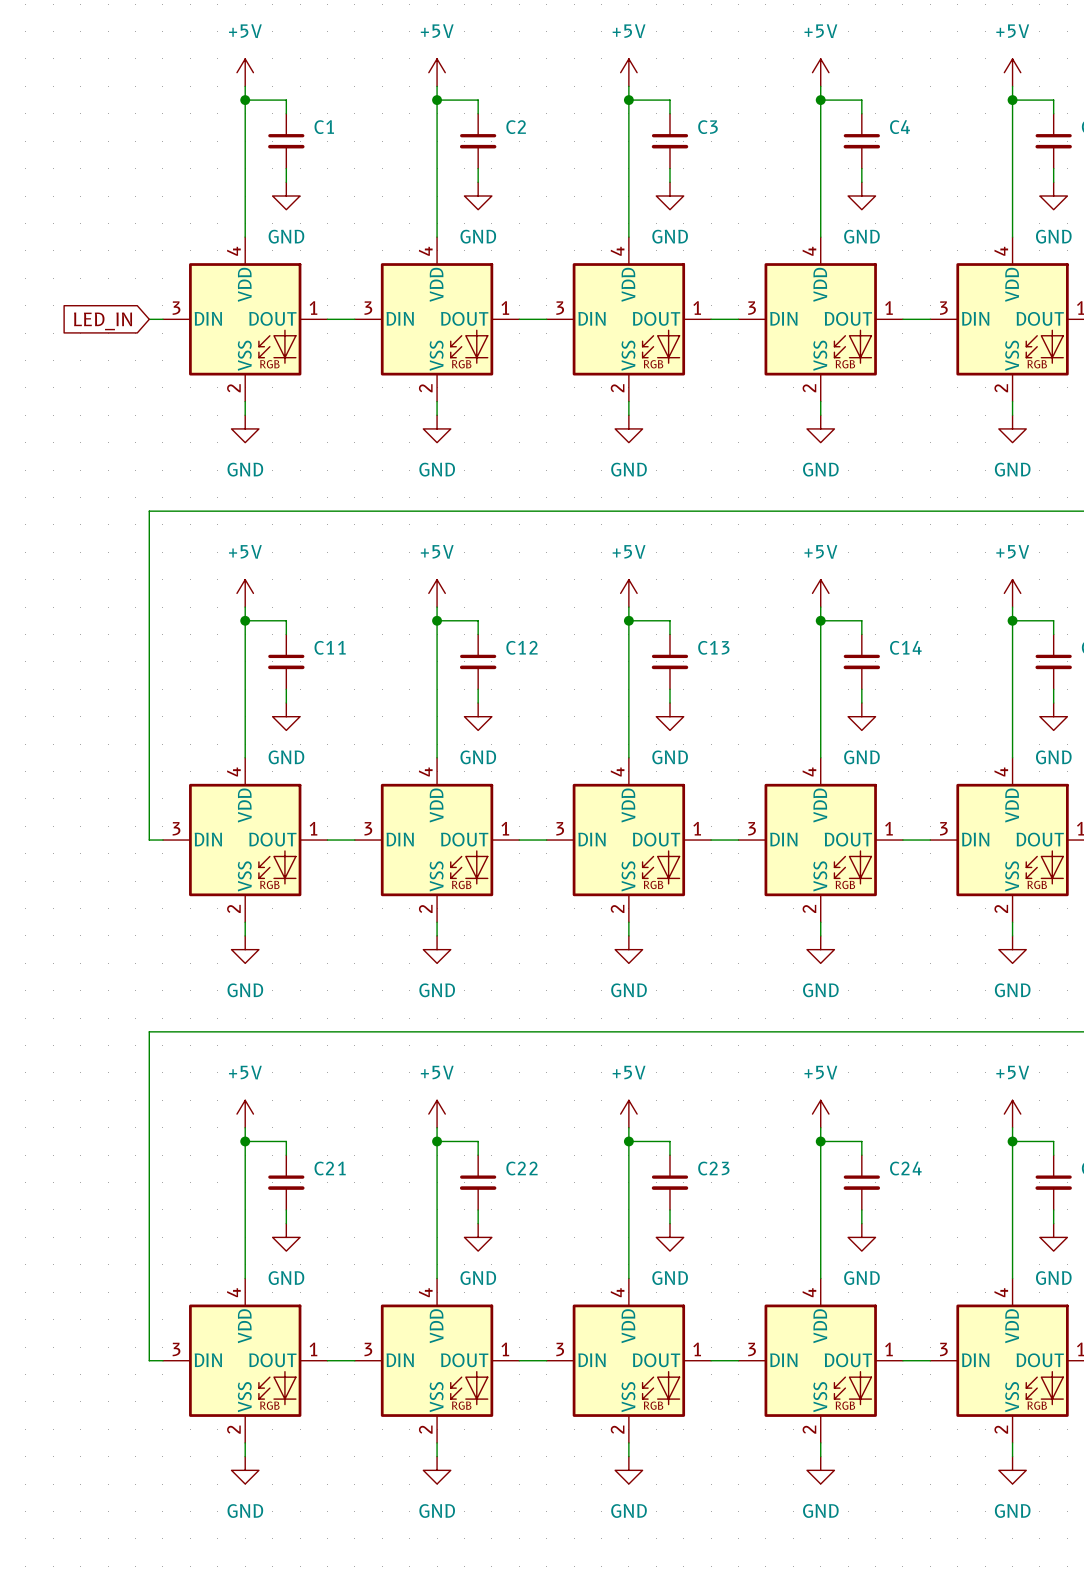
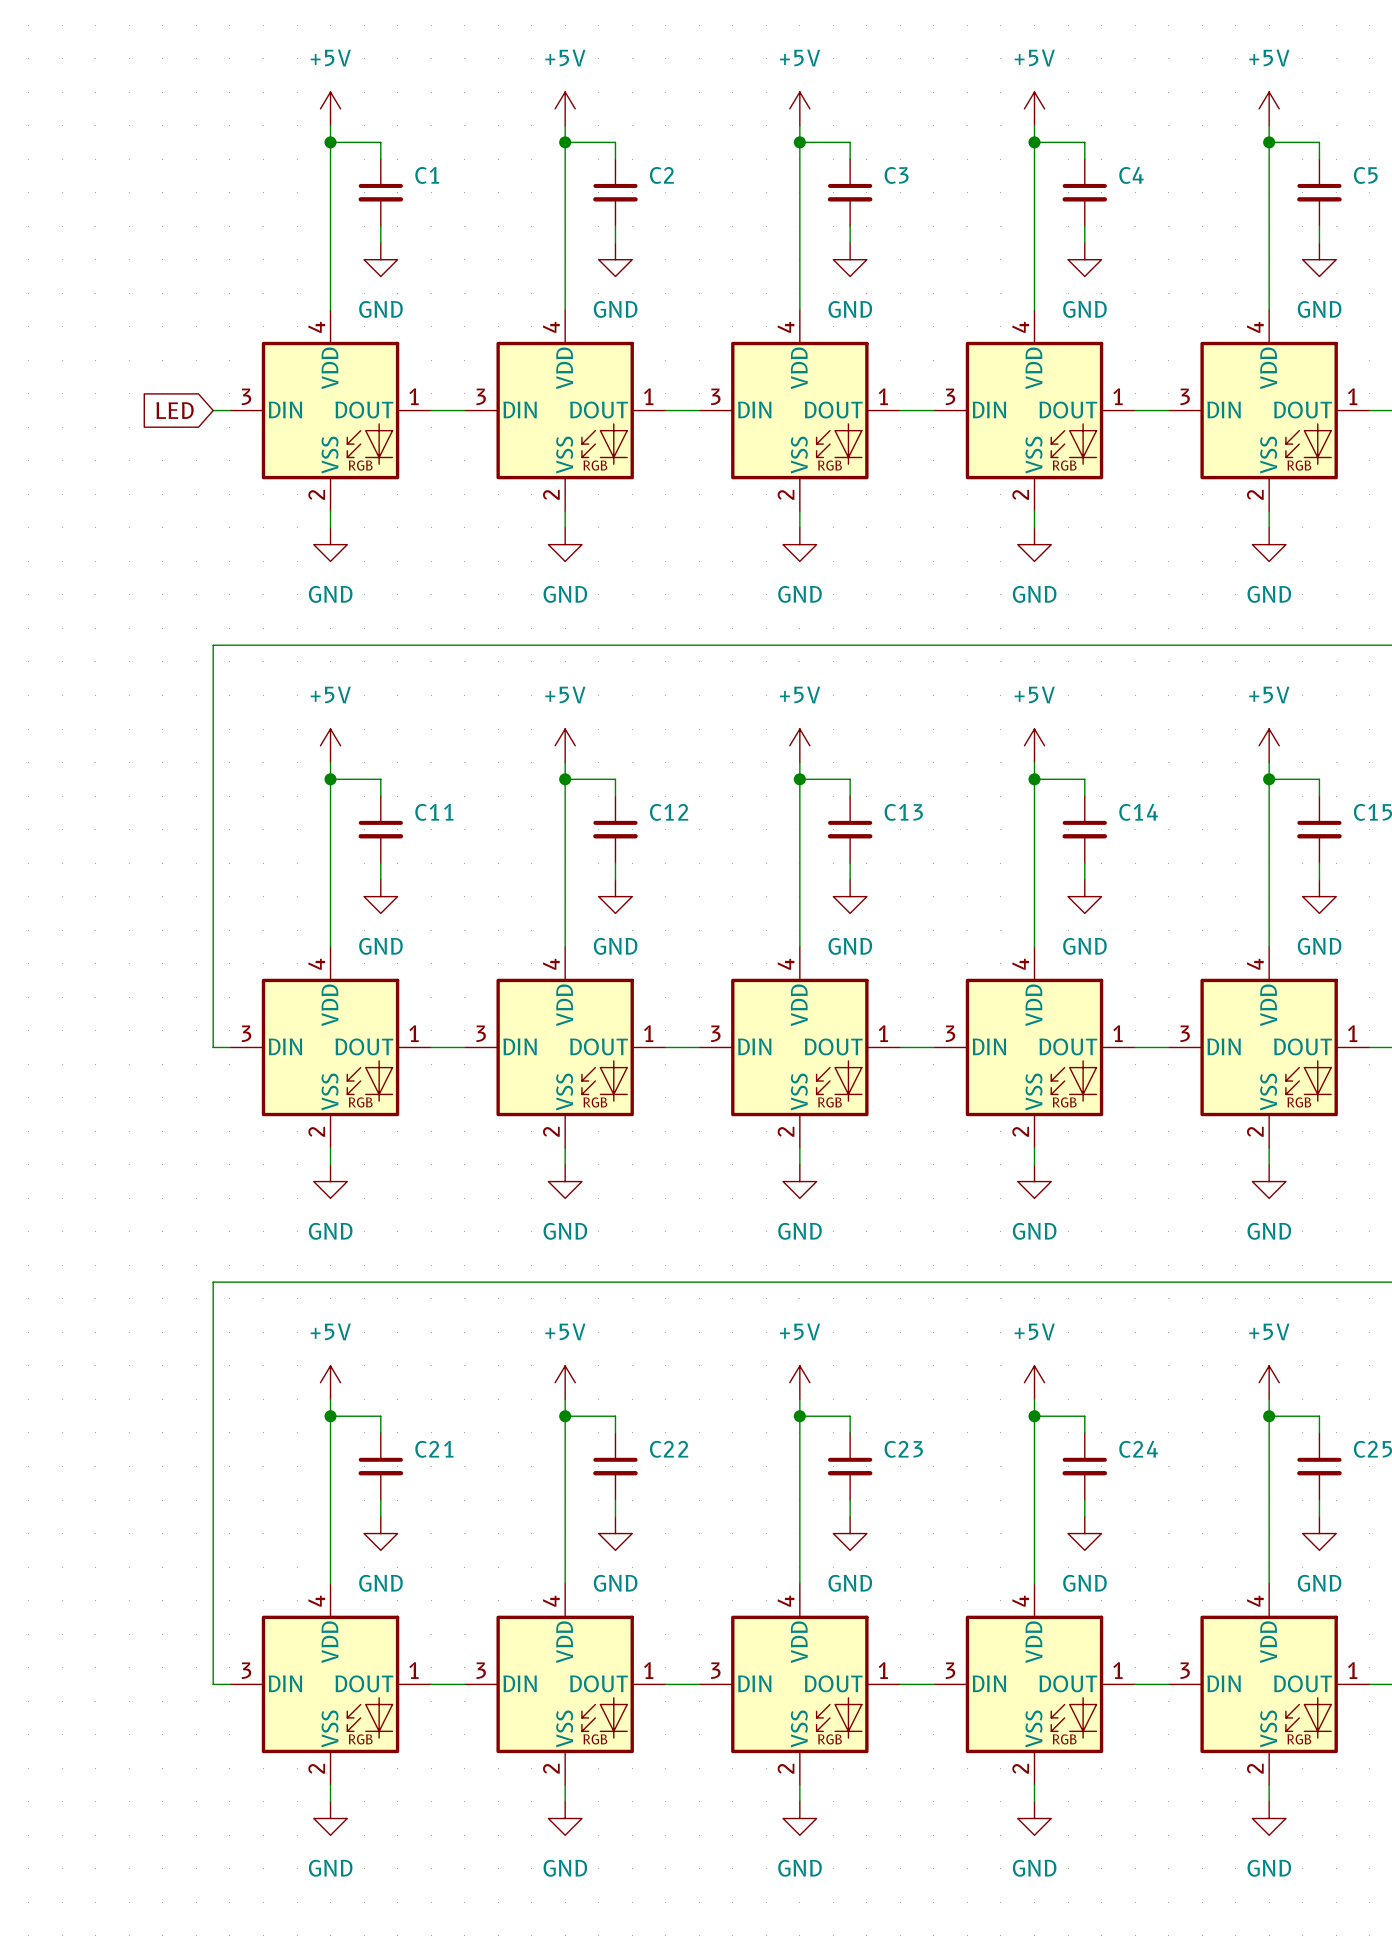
global label: LED_IN (103, 321) -> LED (175, 410)

